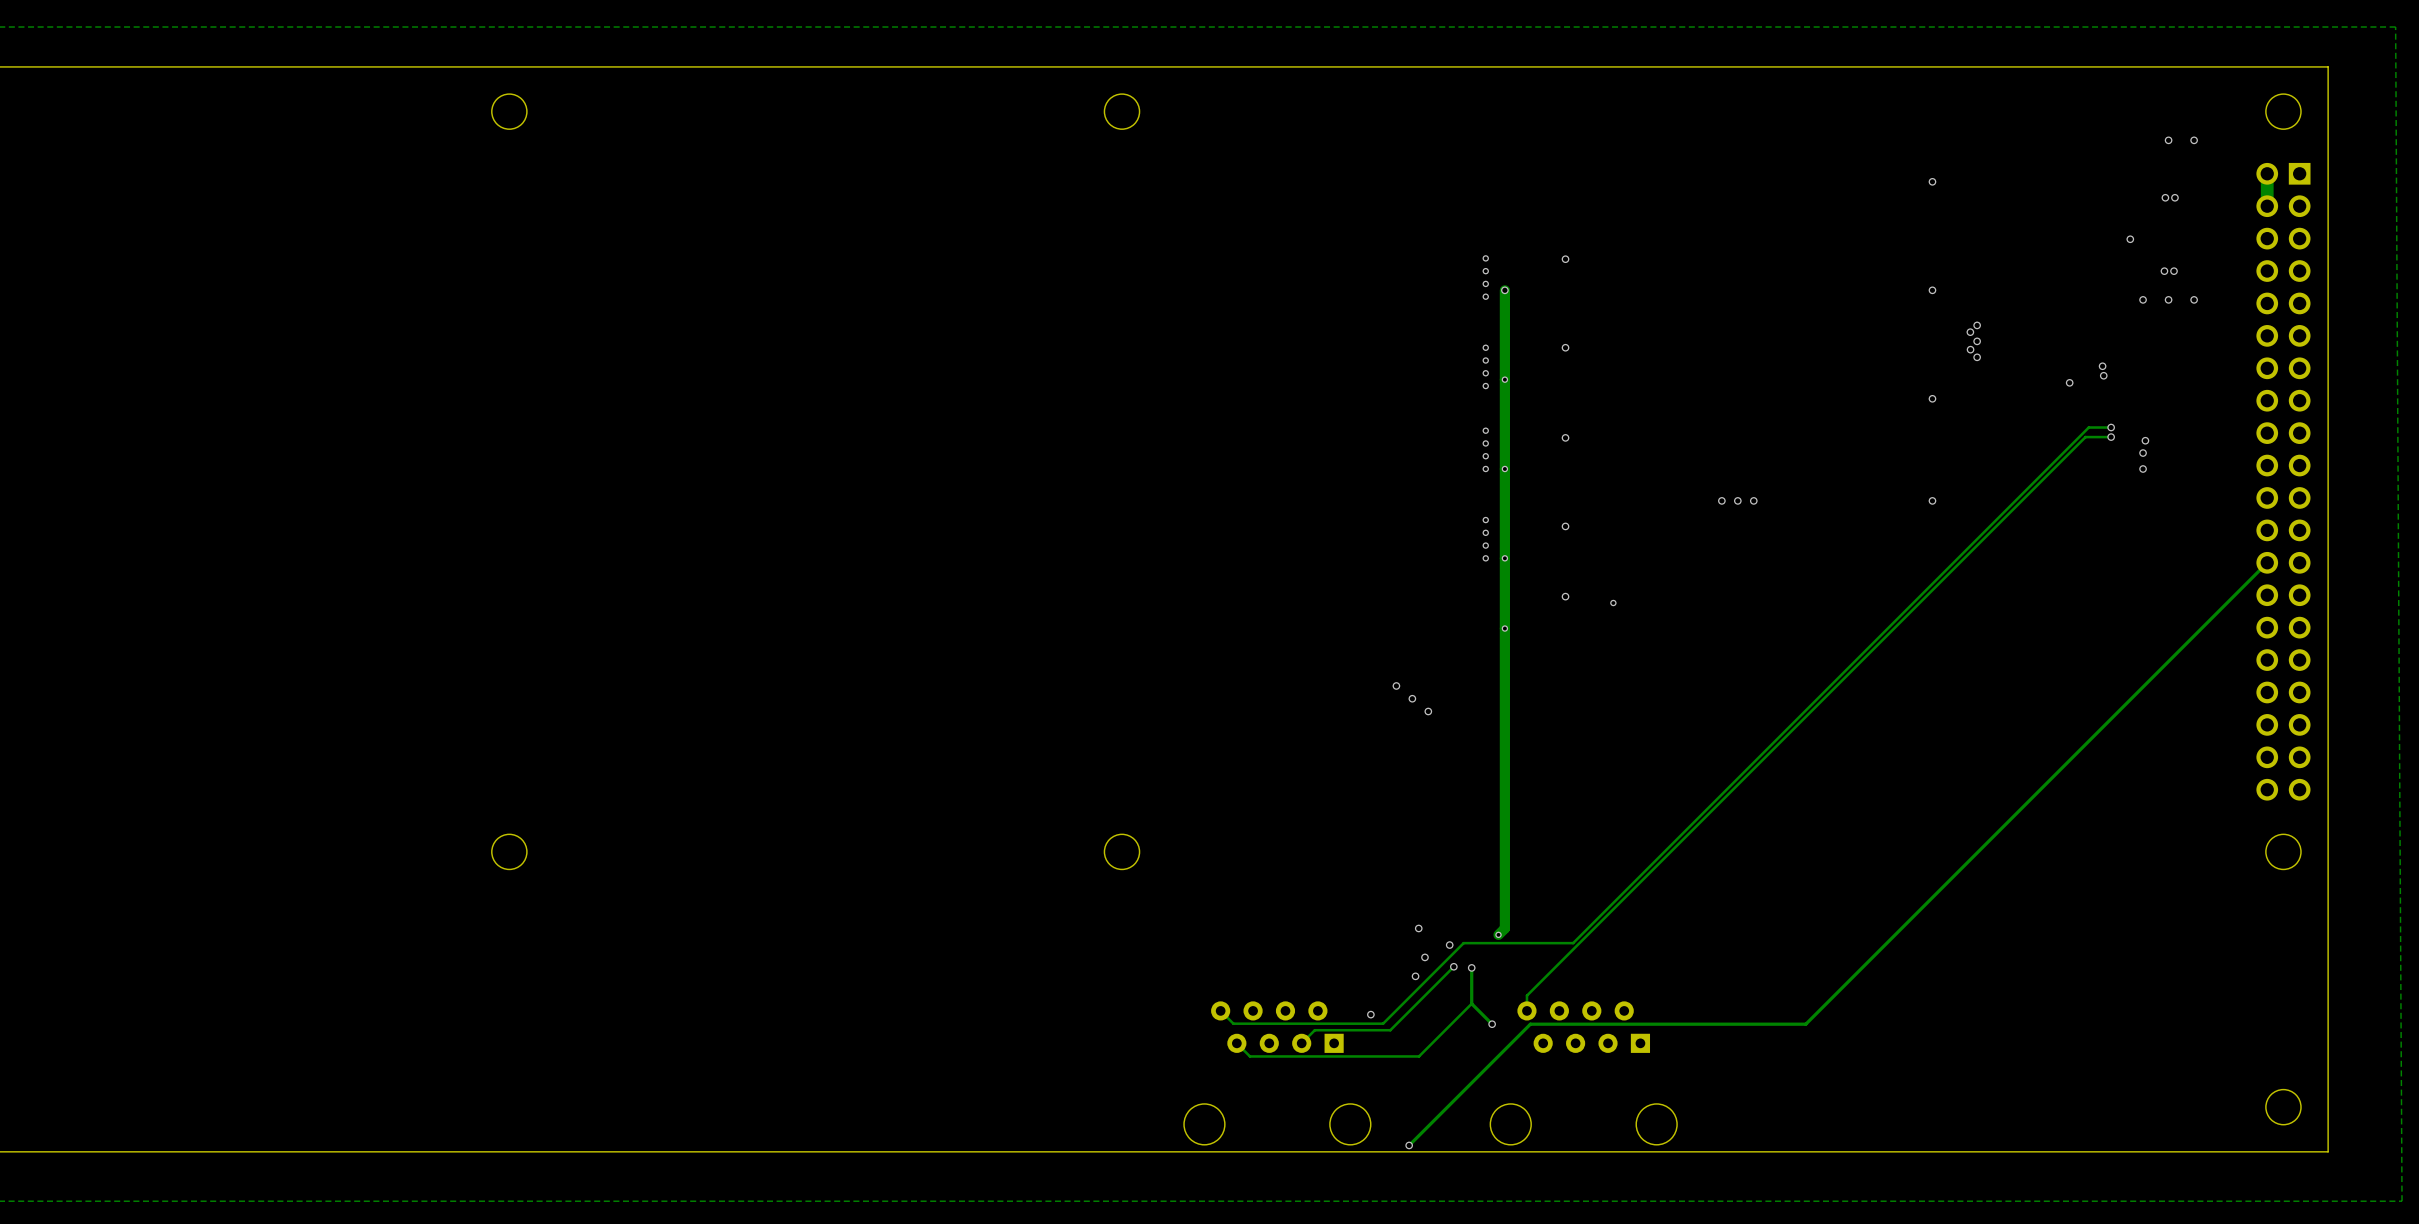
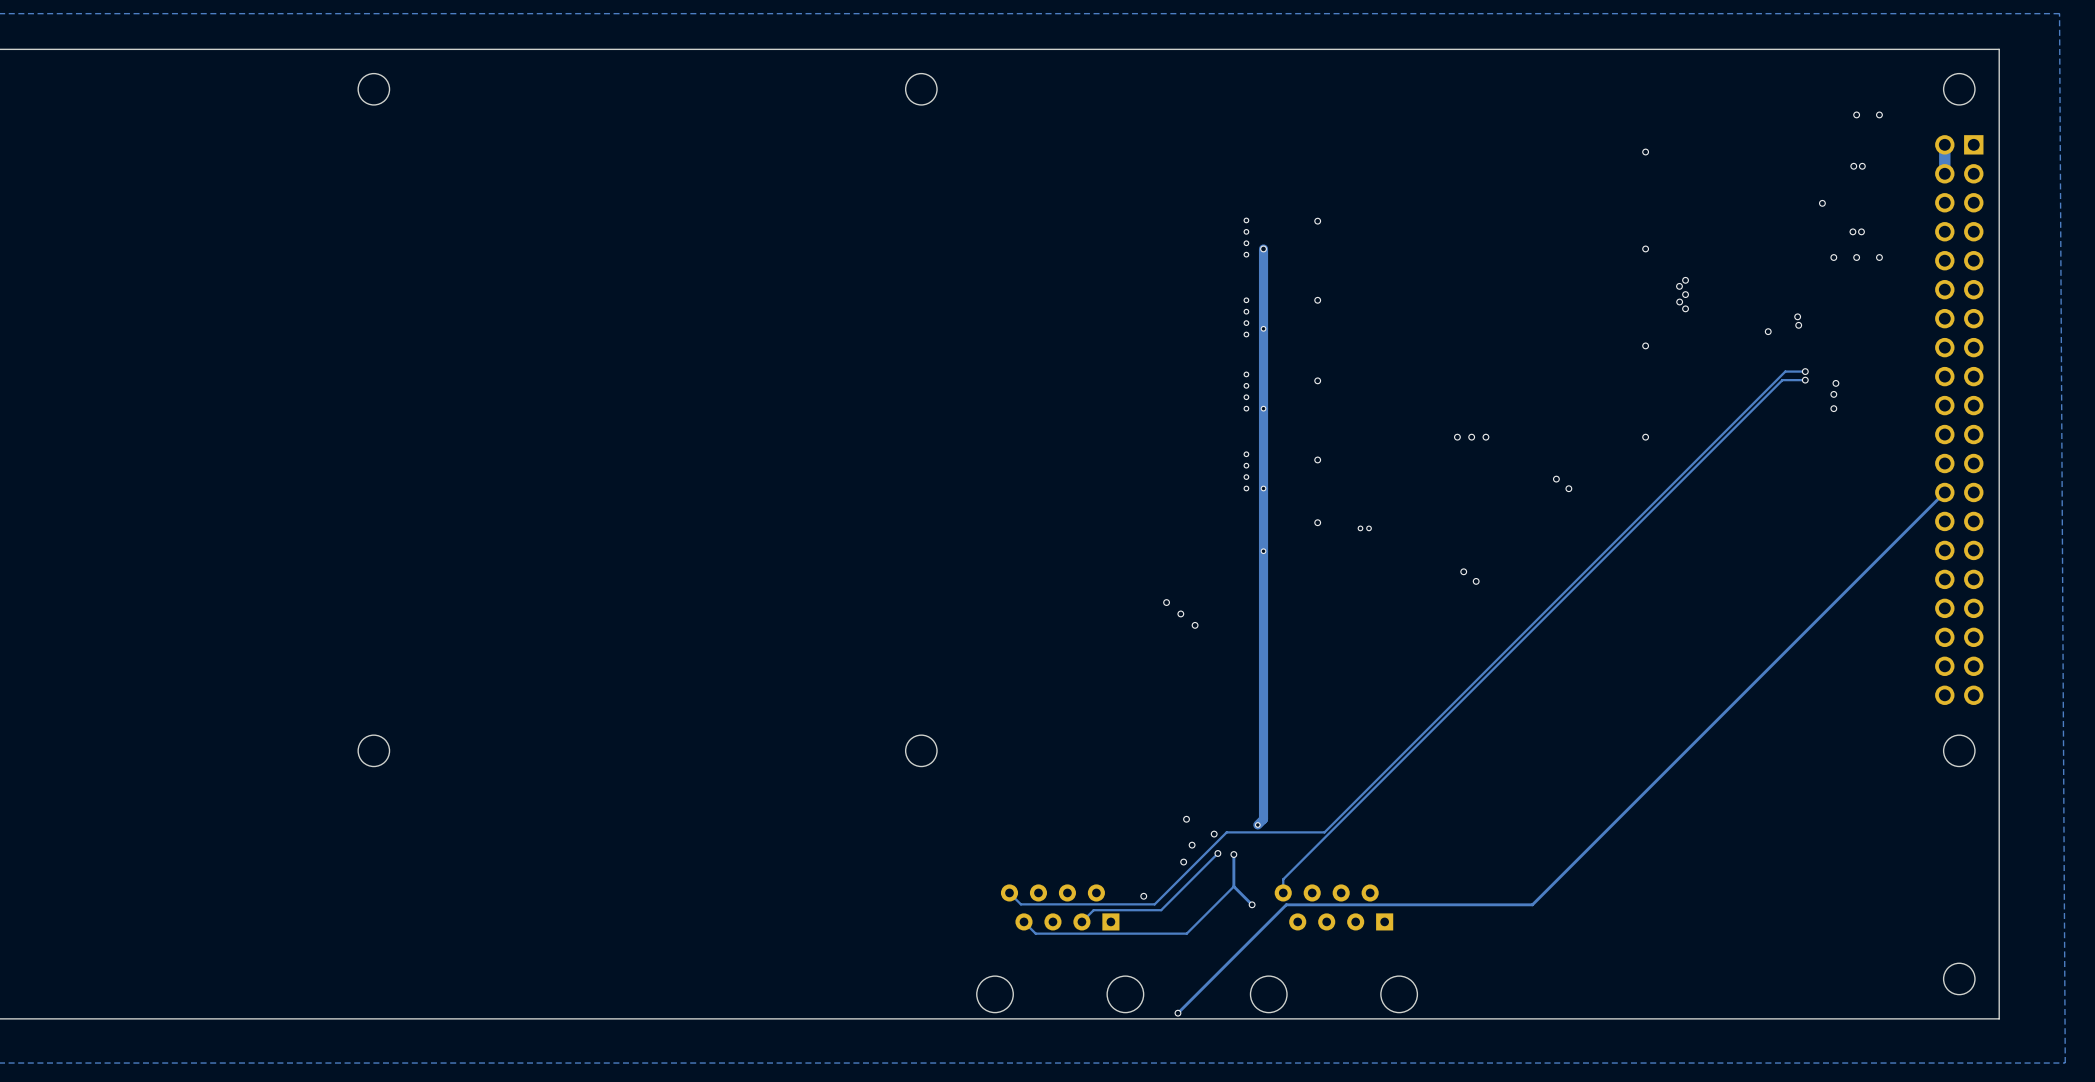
via: none -> (1556, 479)
via: none -> (1568, 488)
via: none -> (1369, 528)
via: none -> (1463, 571)
via: none -> (1476, 581)

